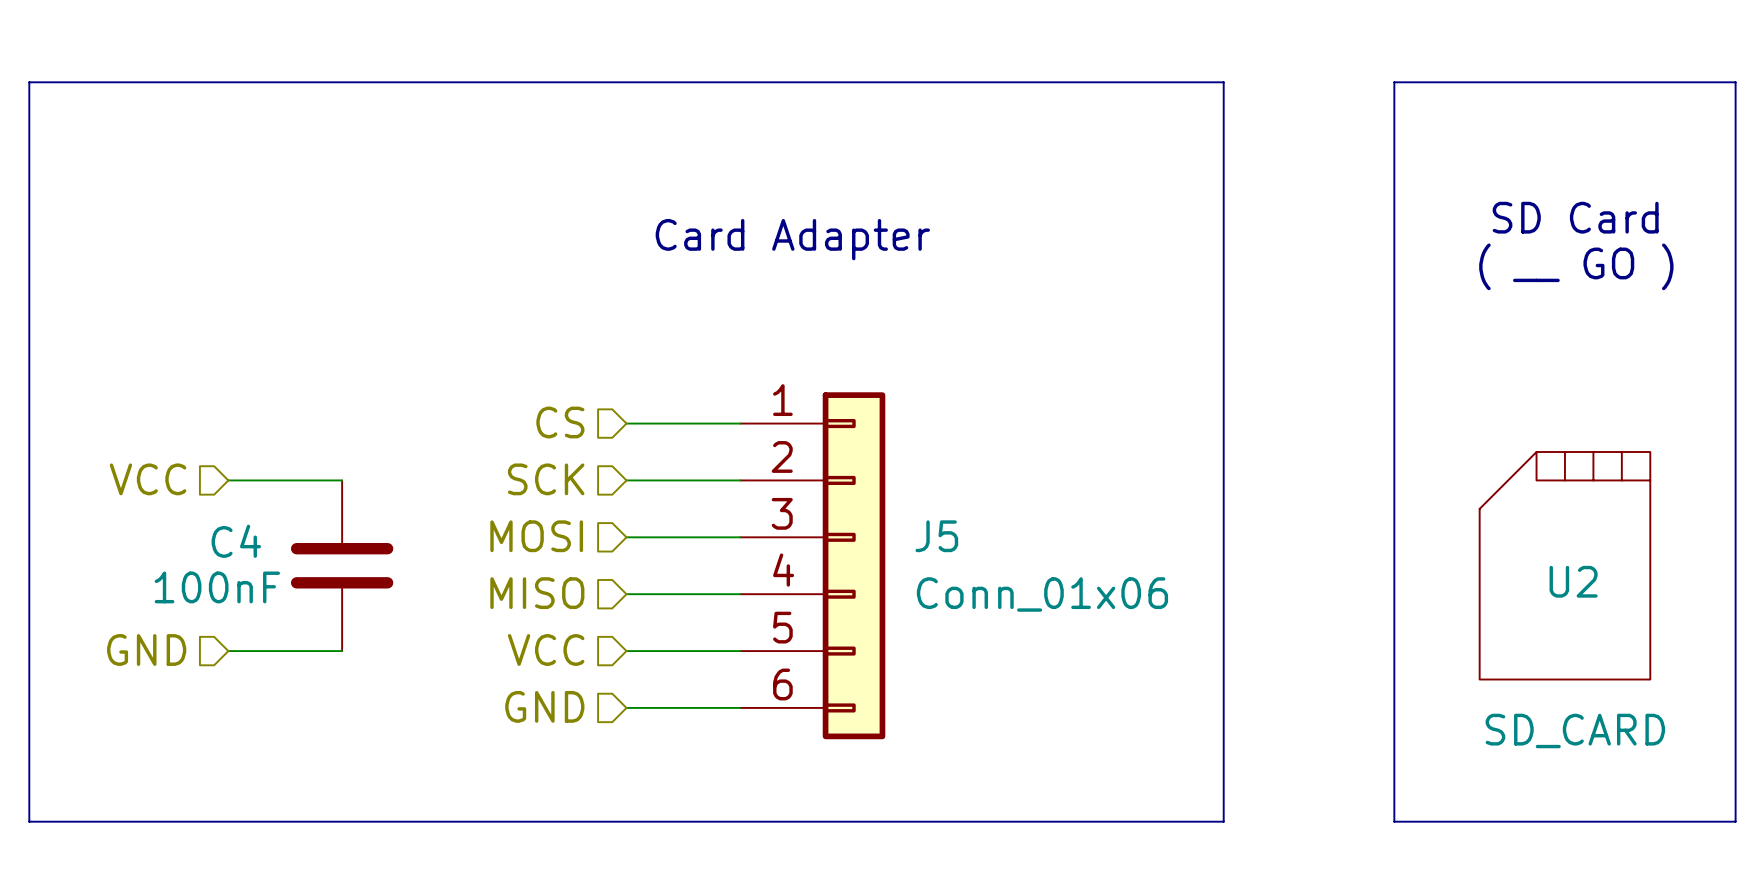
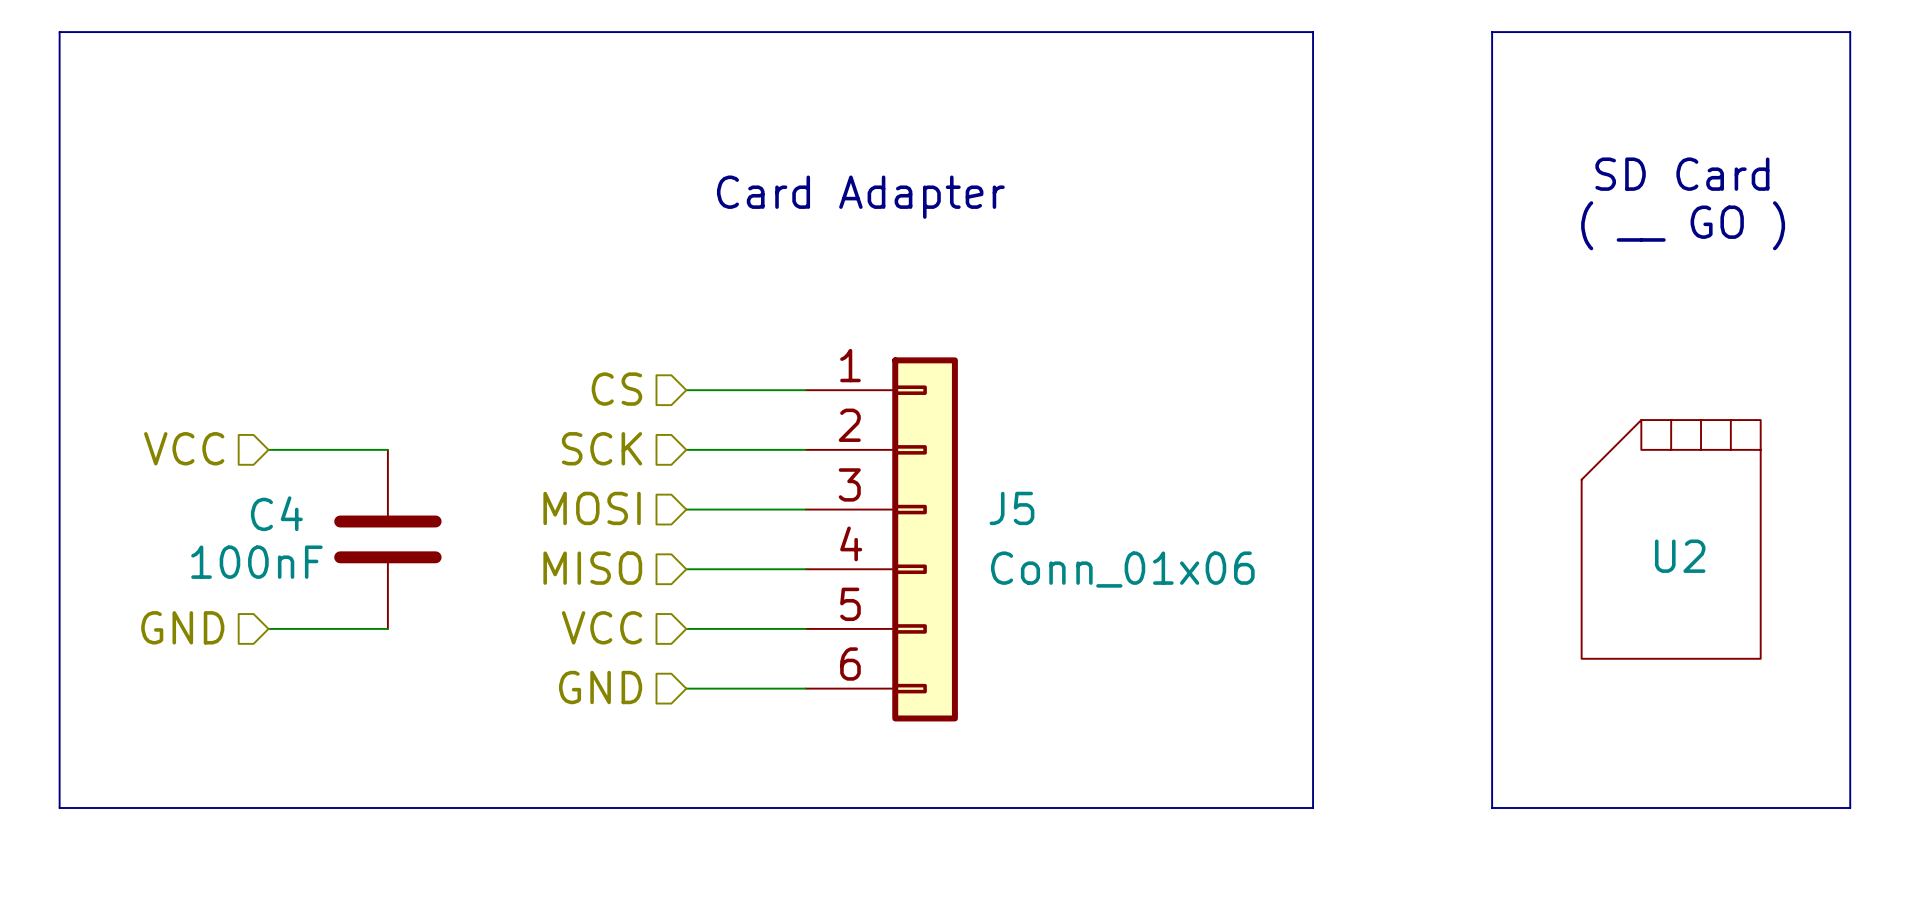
U2 value: SD_CARD (1575, 730) -> none

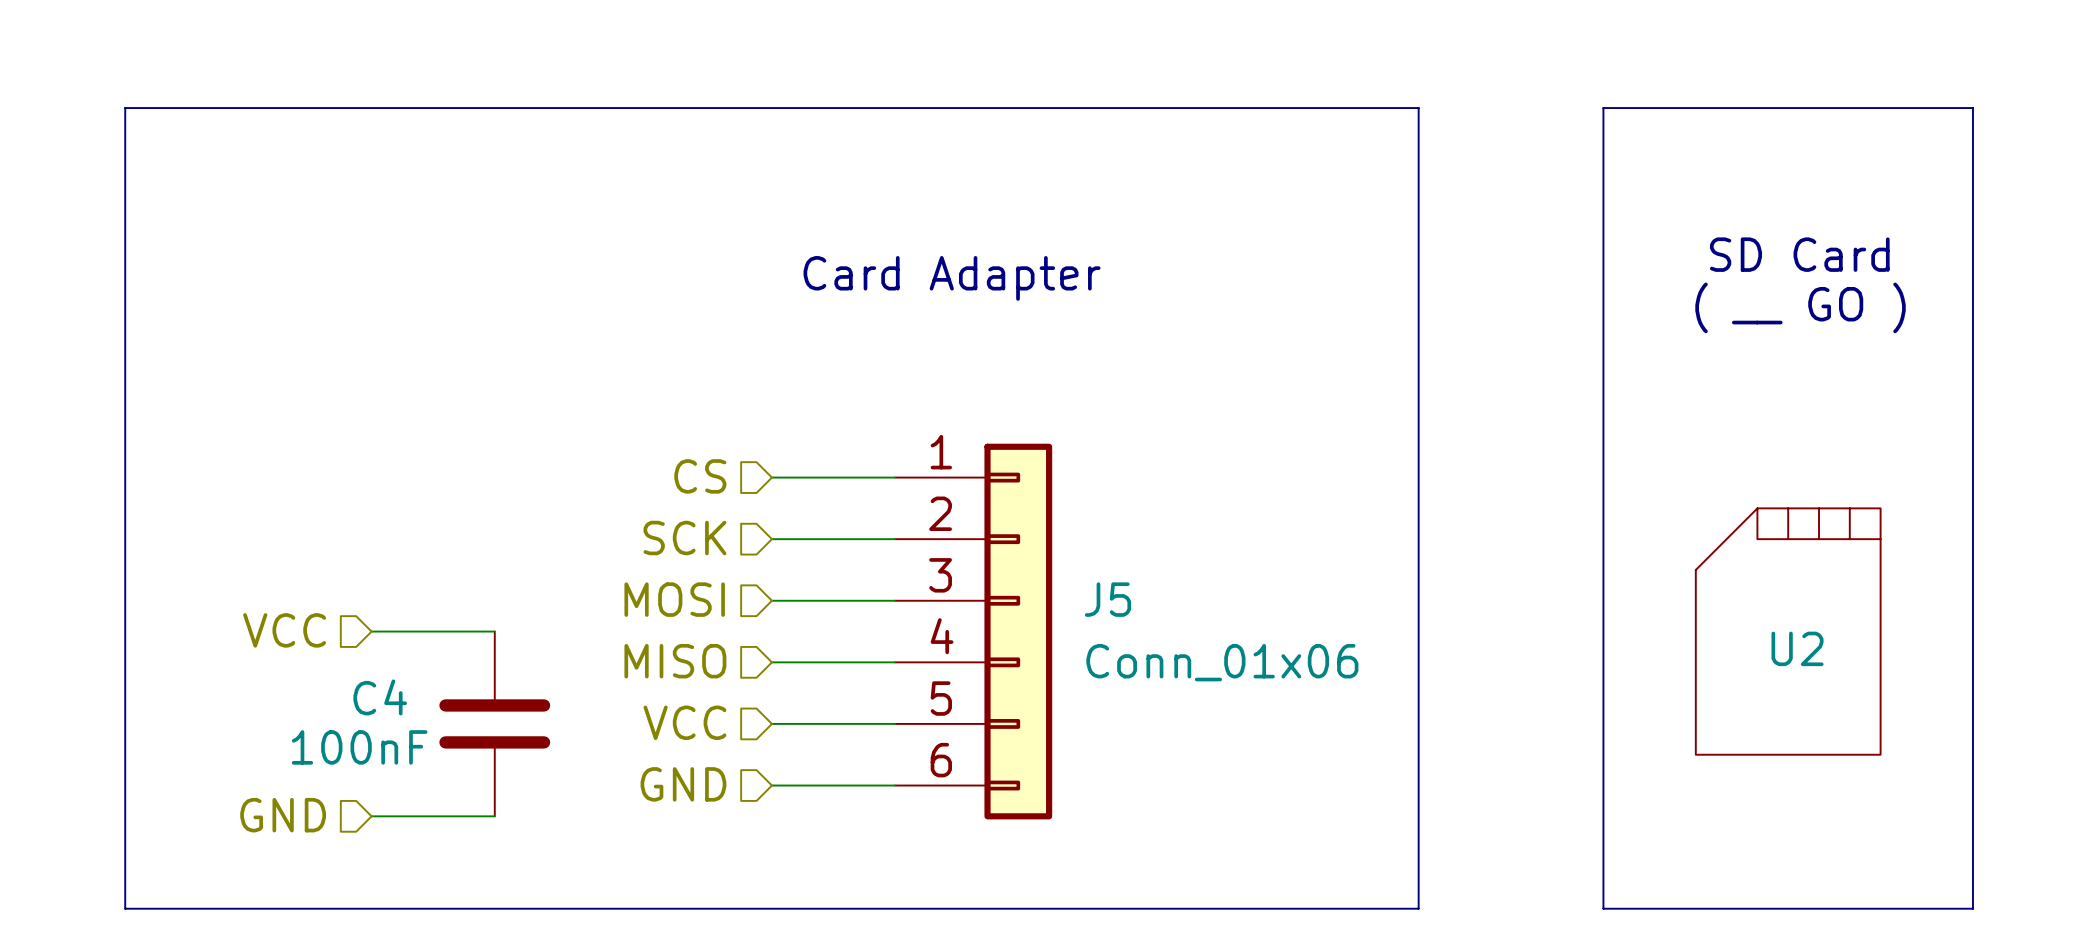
hierarchical label position: VCC (184, 448) -> VCC (284, 630)
wire: (268, 449) (387, 449) -> (371, 631) (494, 631)
C4 position: (387, 539) -> (494, 723)
hierarchical label position: GND (182, 627) -> GND (283, 815)
wire: (268, 628) (387, 628) -> (371, 816) (494, 816)

